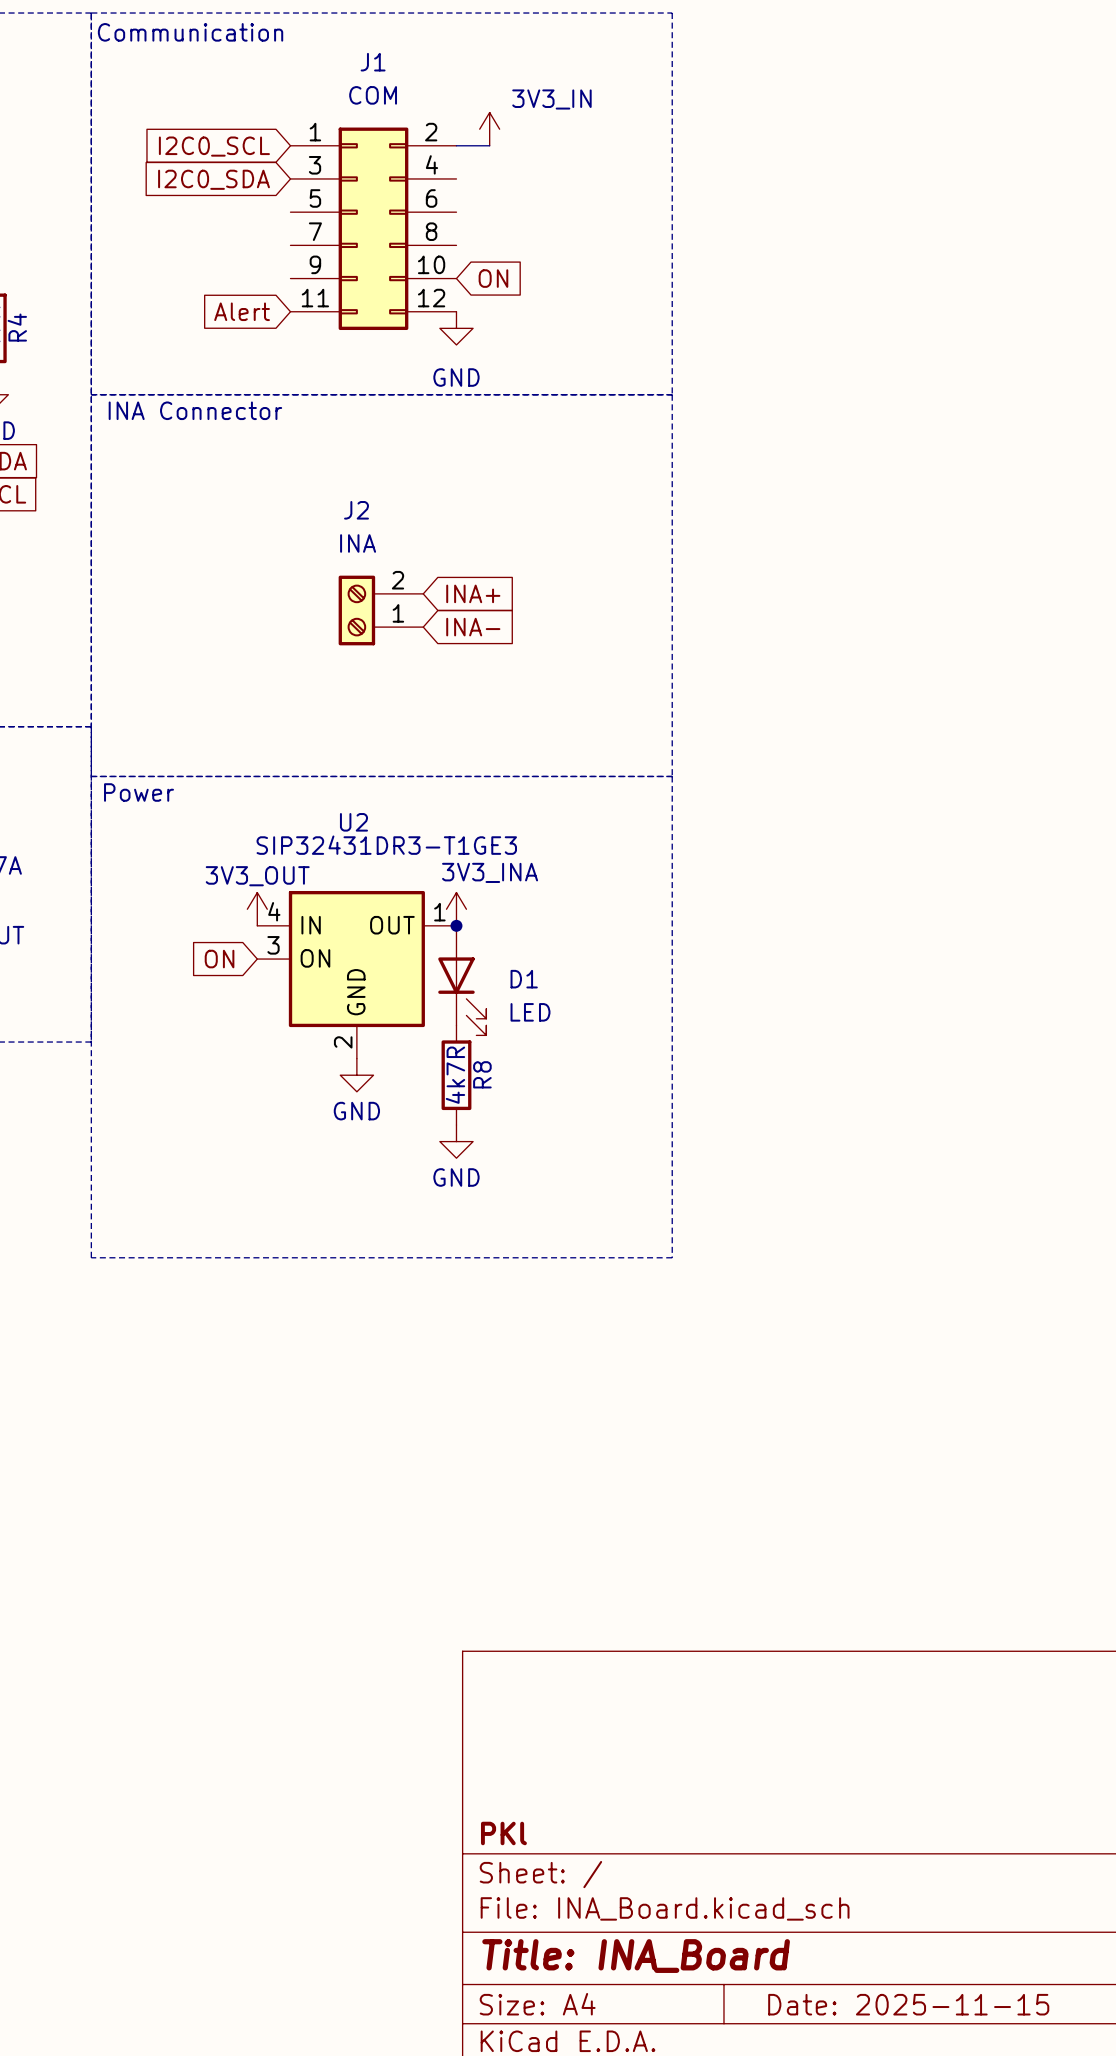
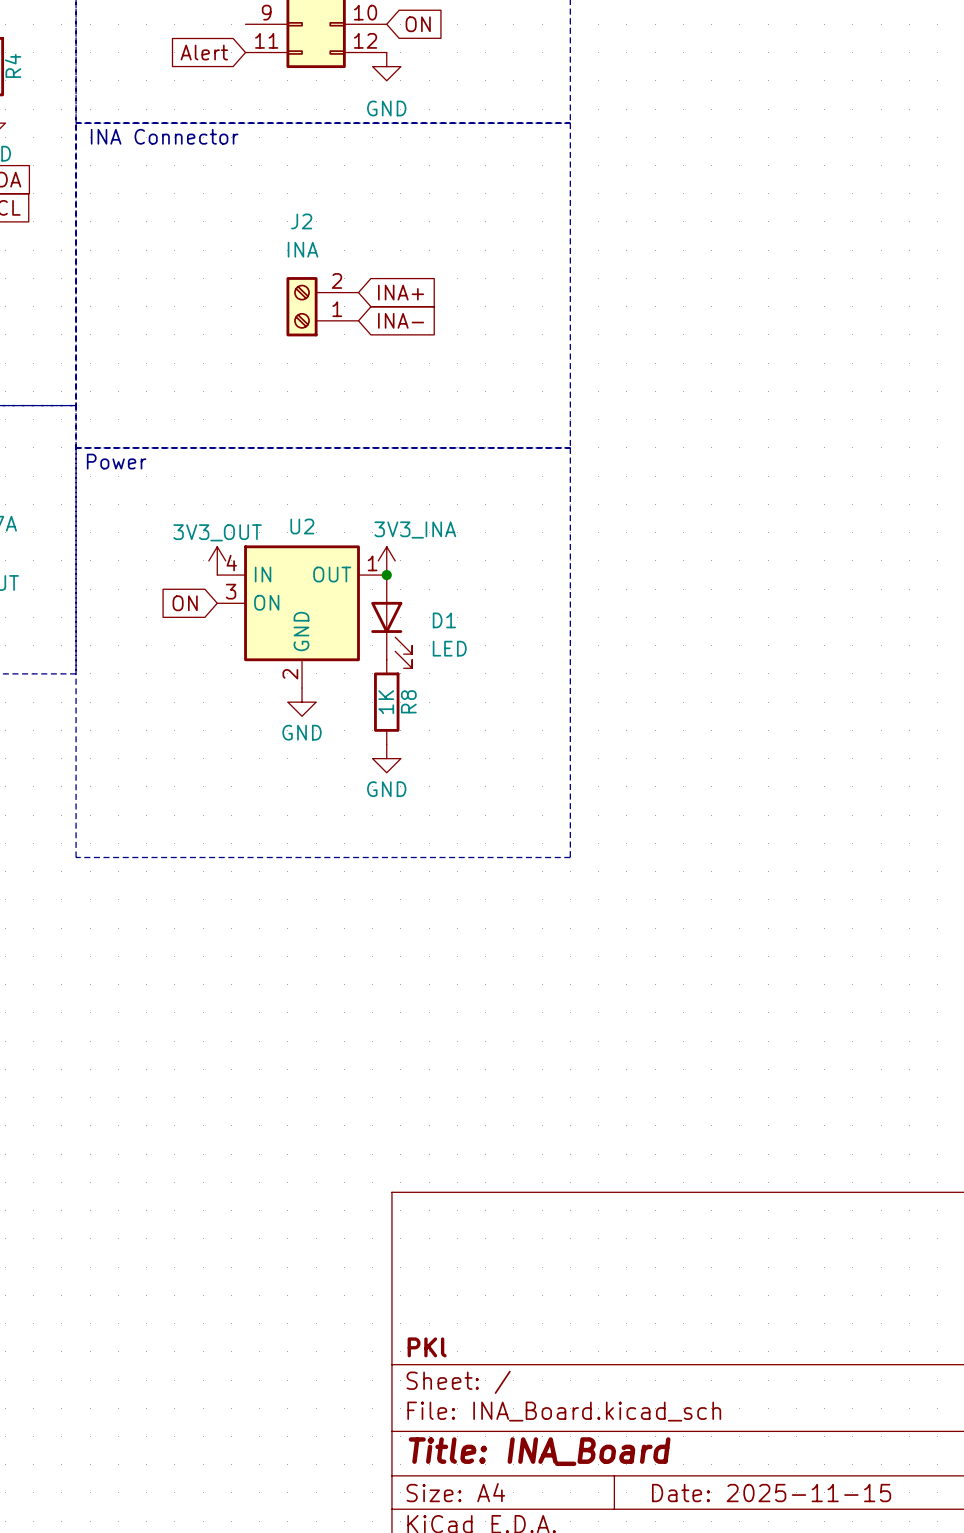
U2 name position: U2 (353, 822) -> U2 (302, 526)
U2 value: SIP32431DR3-T1GE3 (386, 845) -> none
R8 value: 4k7R (455, 1075) -> 1K (386, 702)

